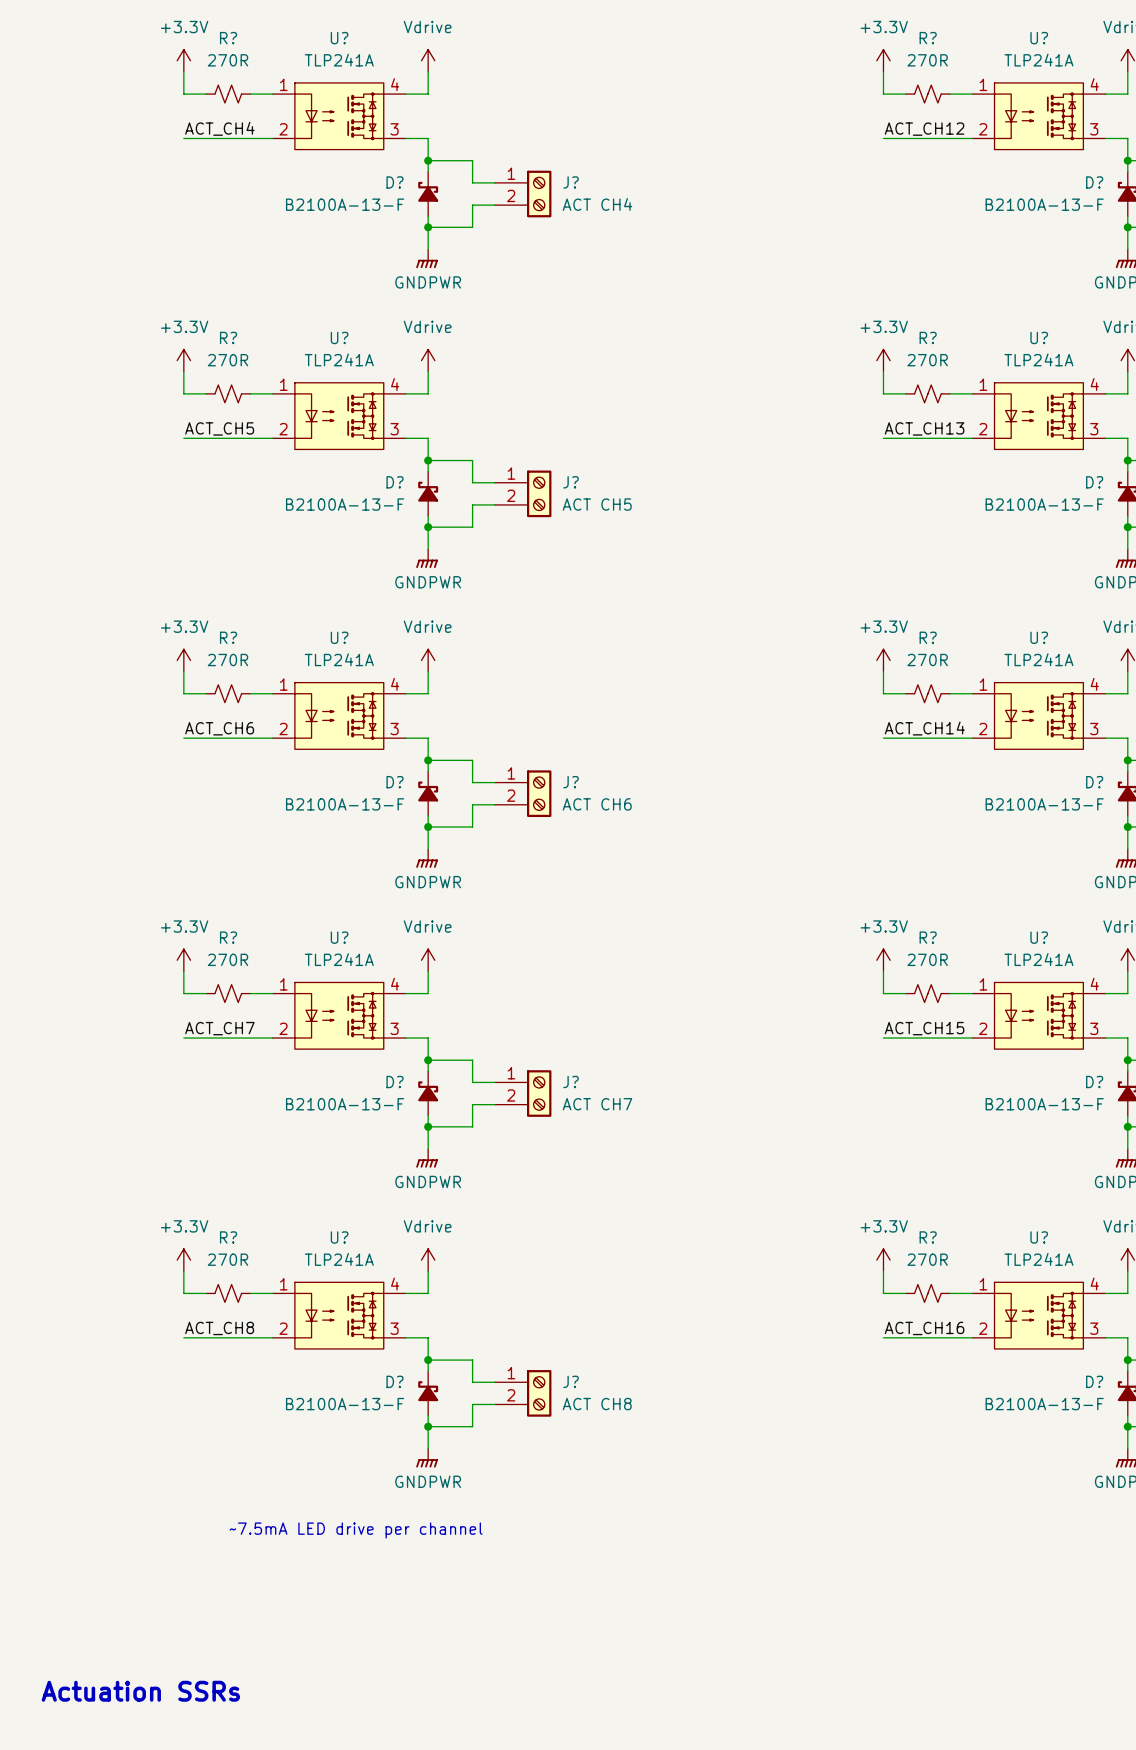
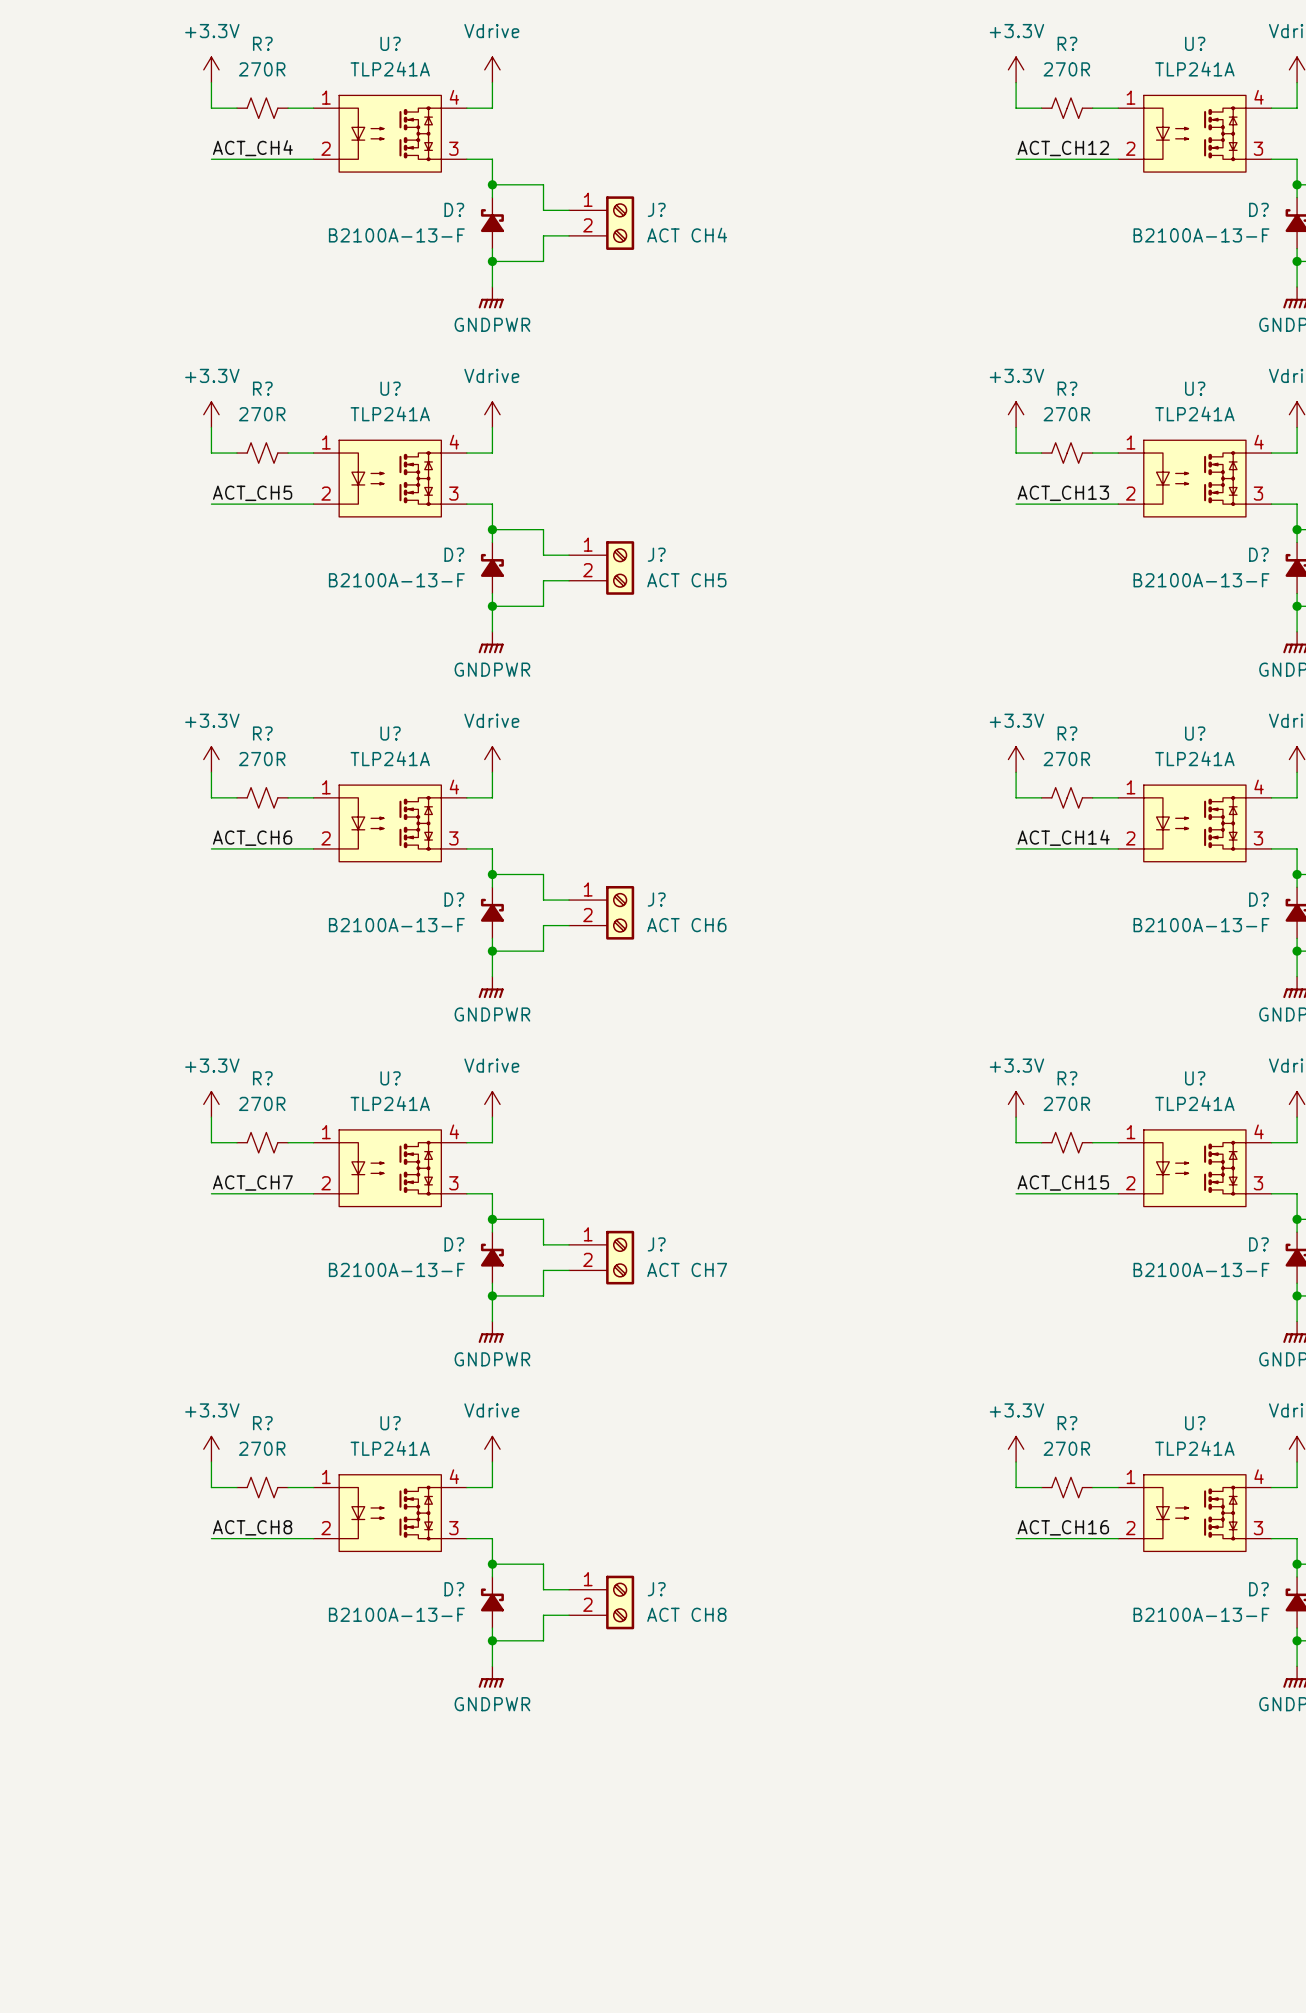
text: ~7.5mA LED drive per channel (356, 1530) -> none
text: Actuation SSRs (140, 1691) -> none

